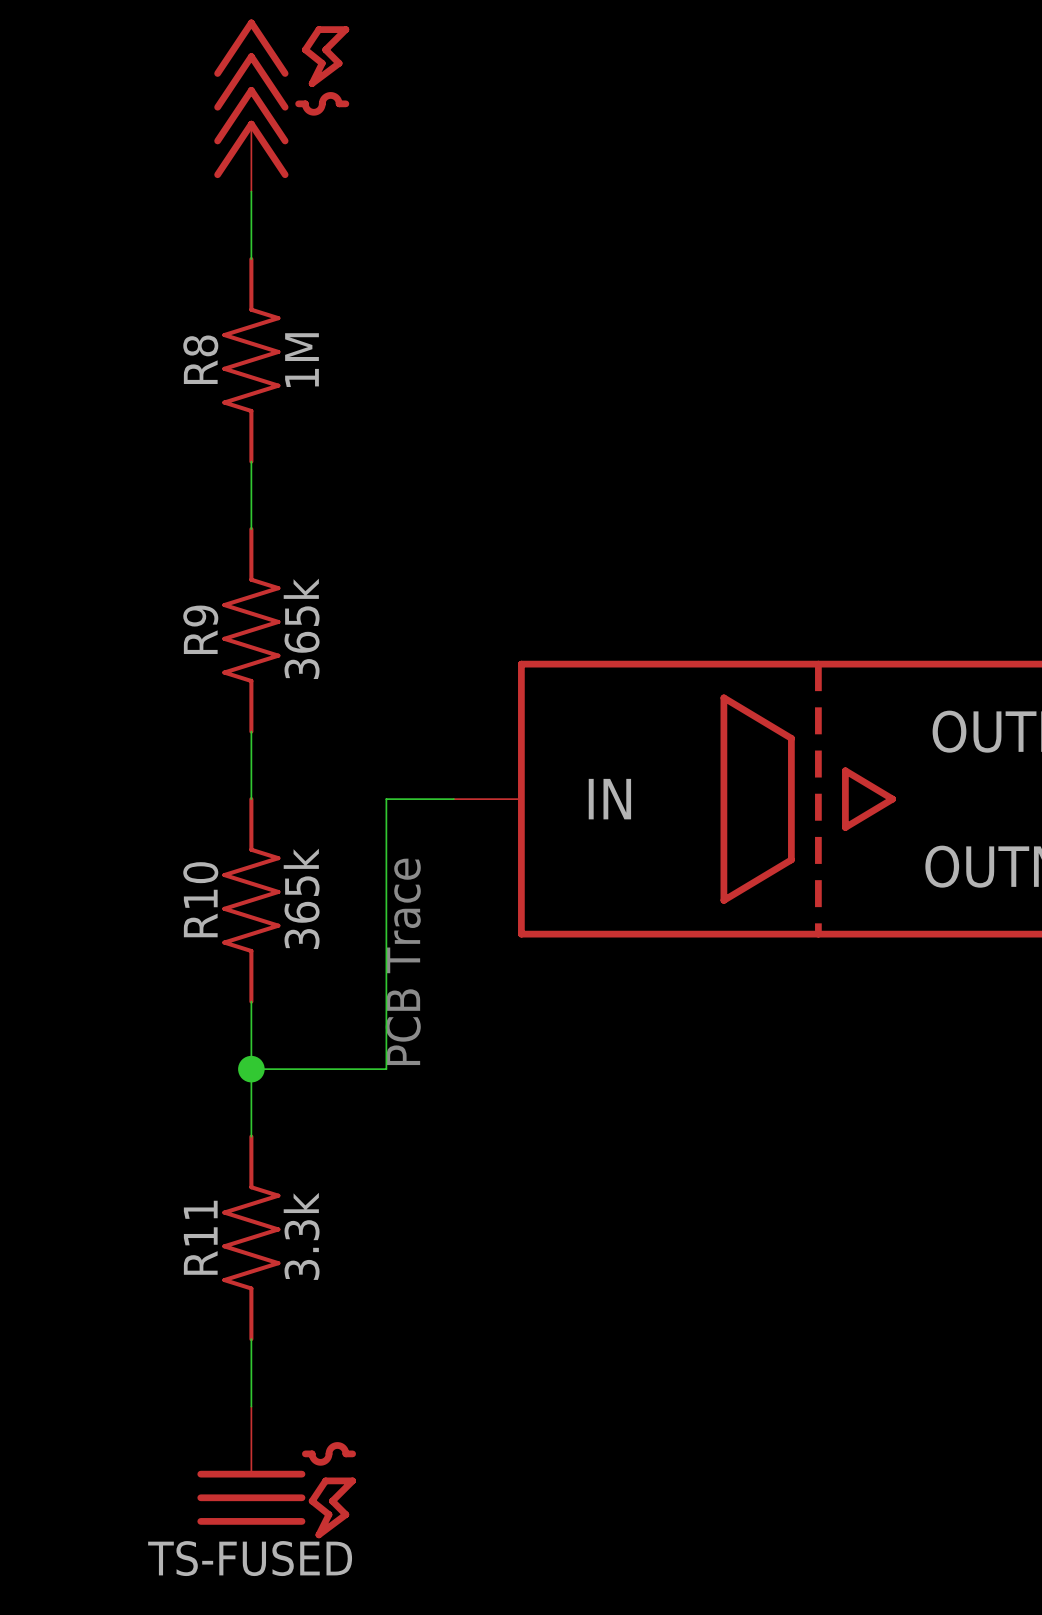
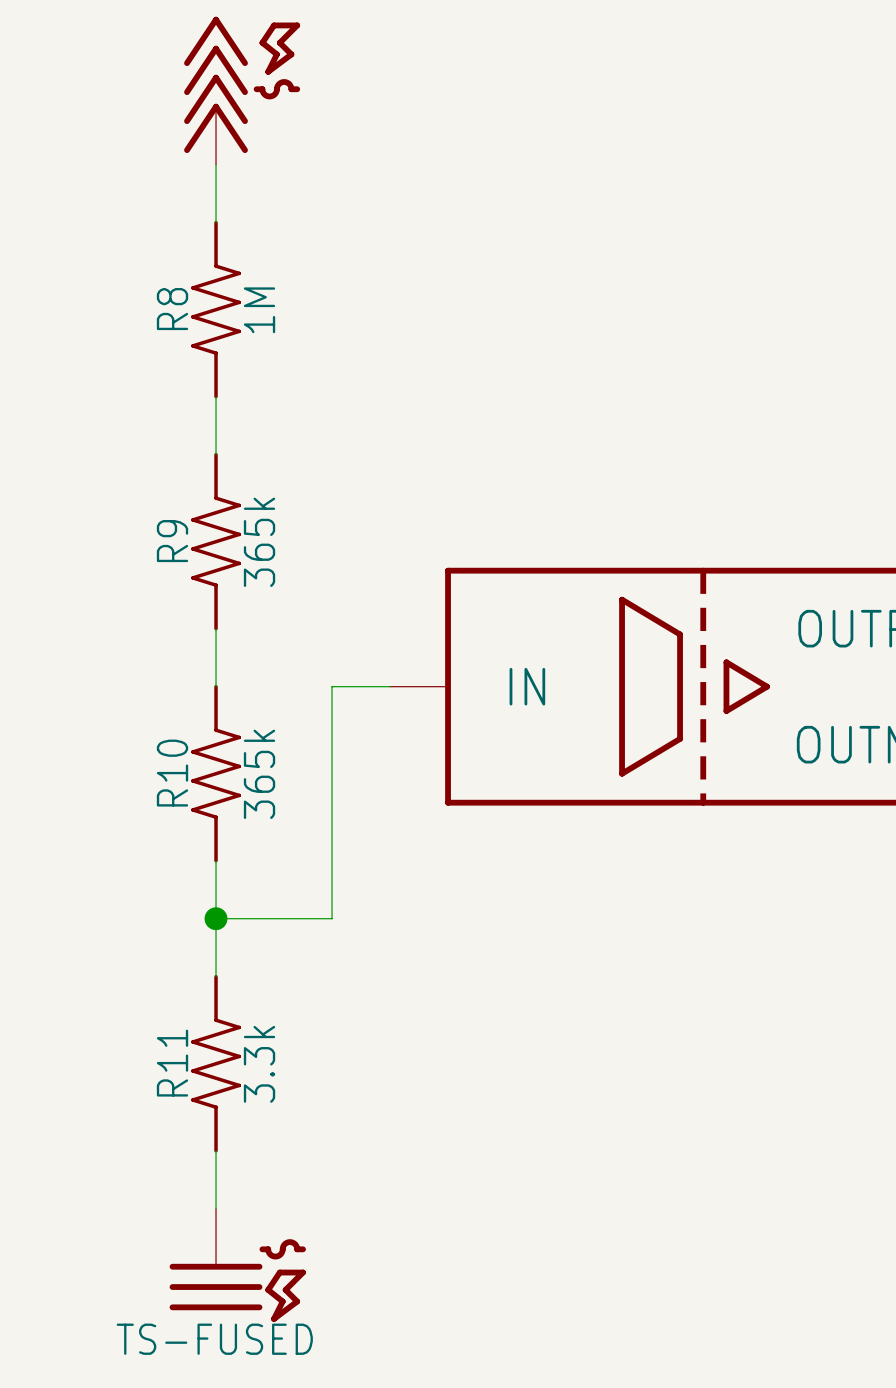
text: PCB Trace (403, 961) -> none

